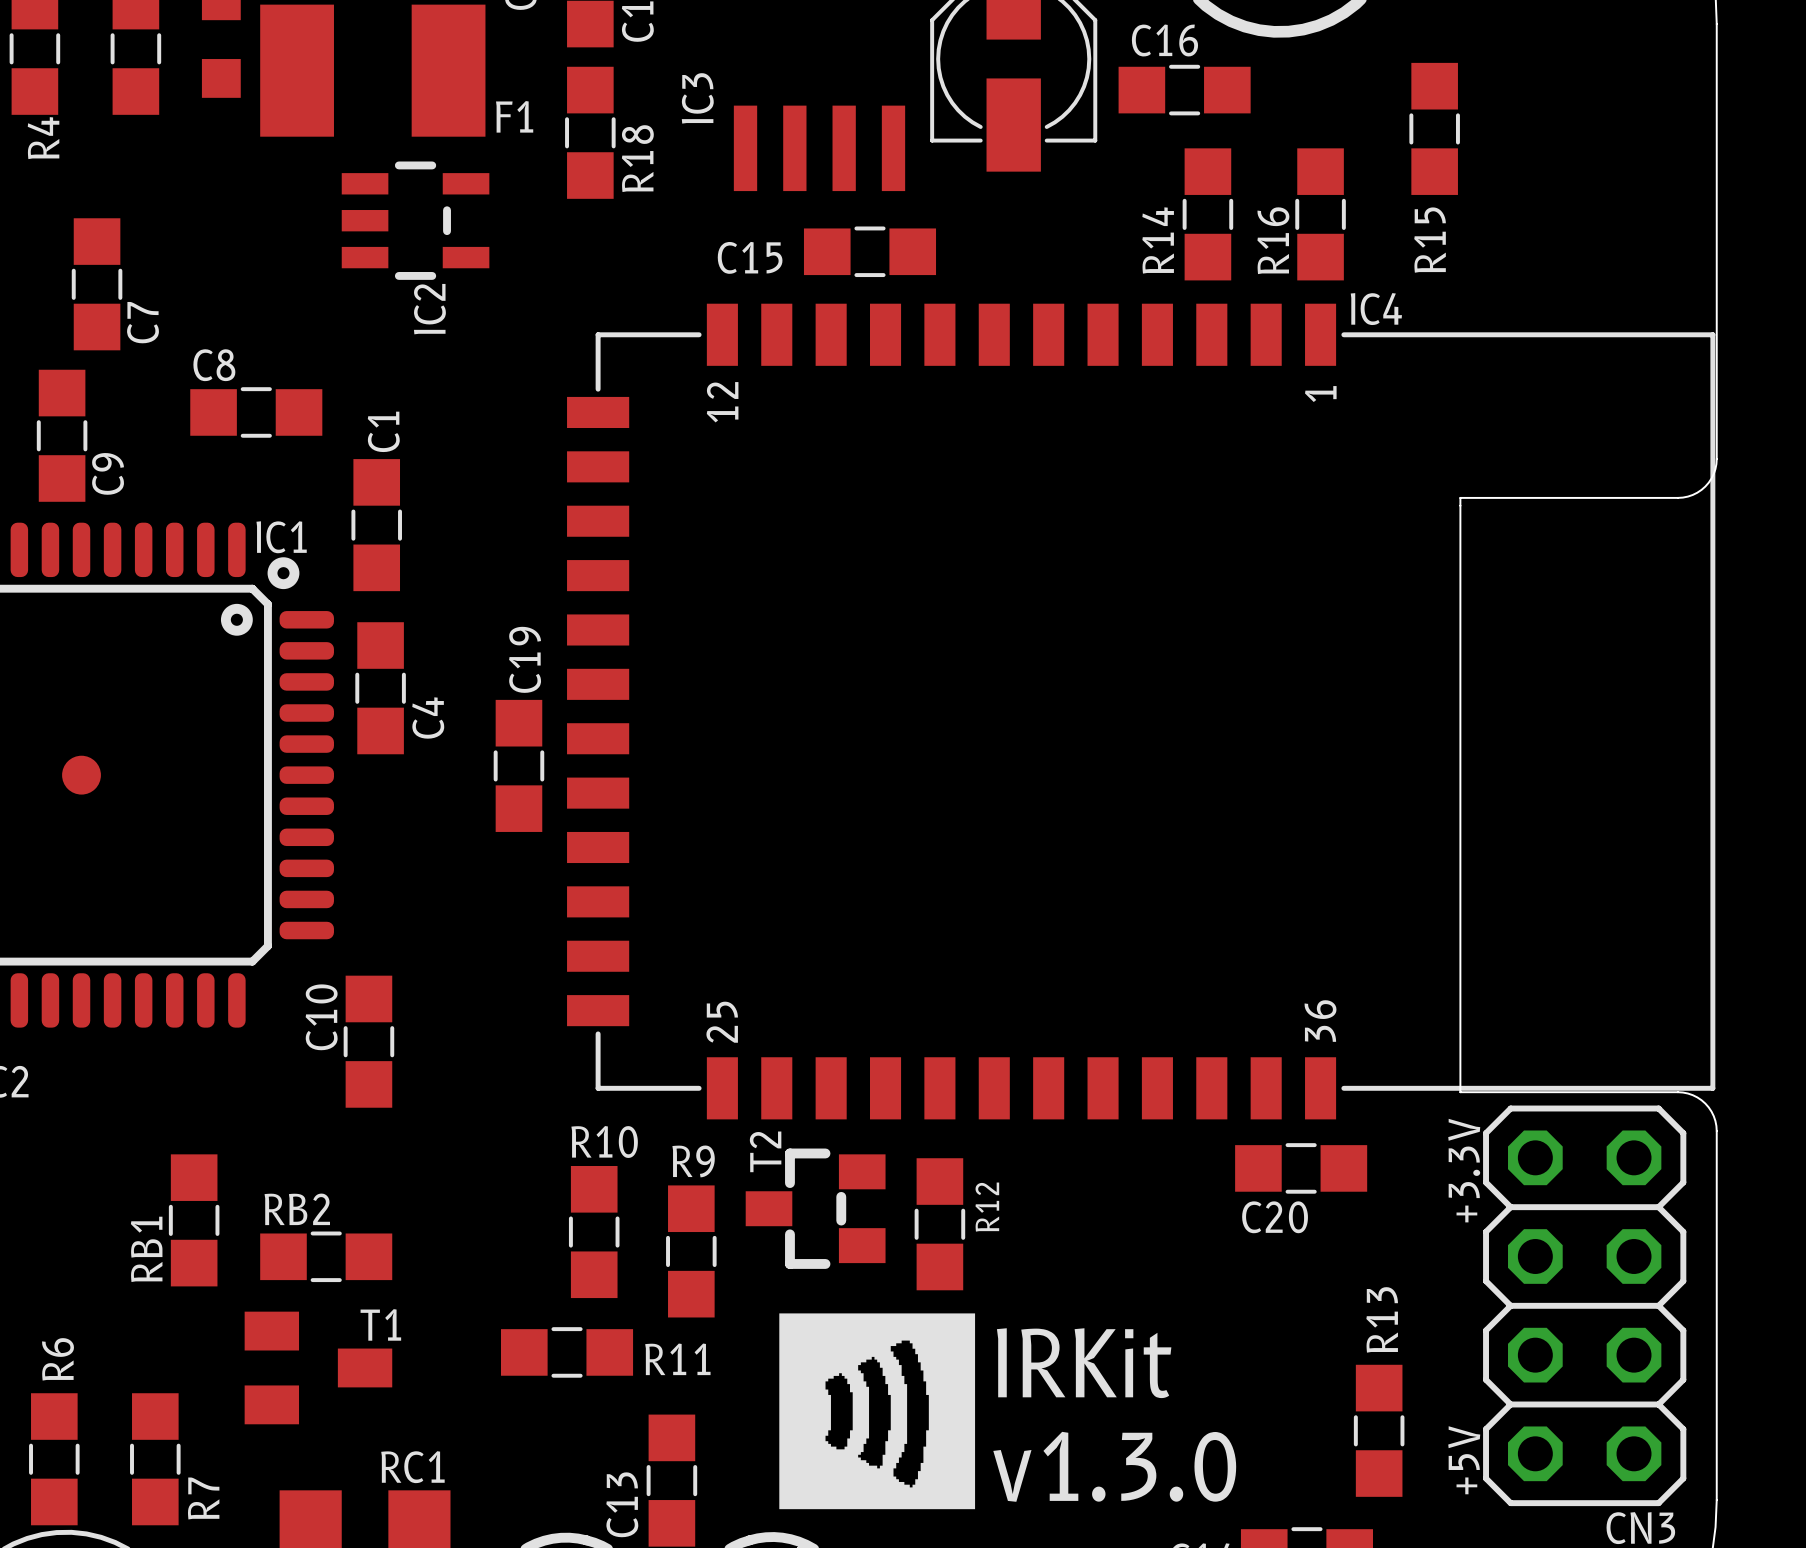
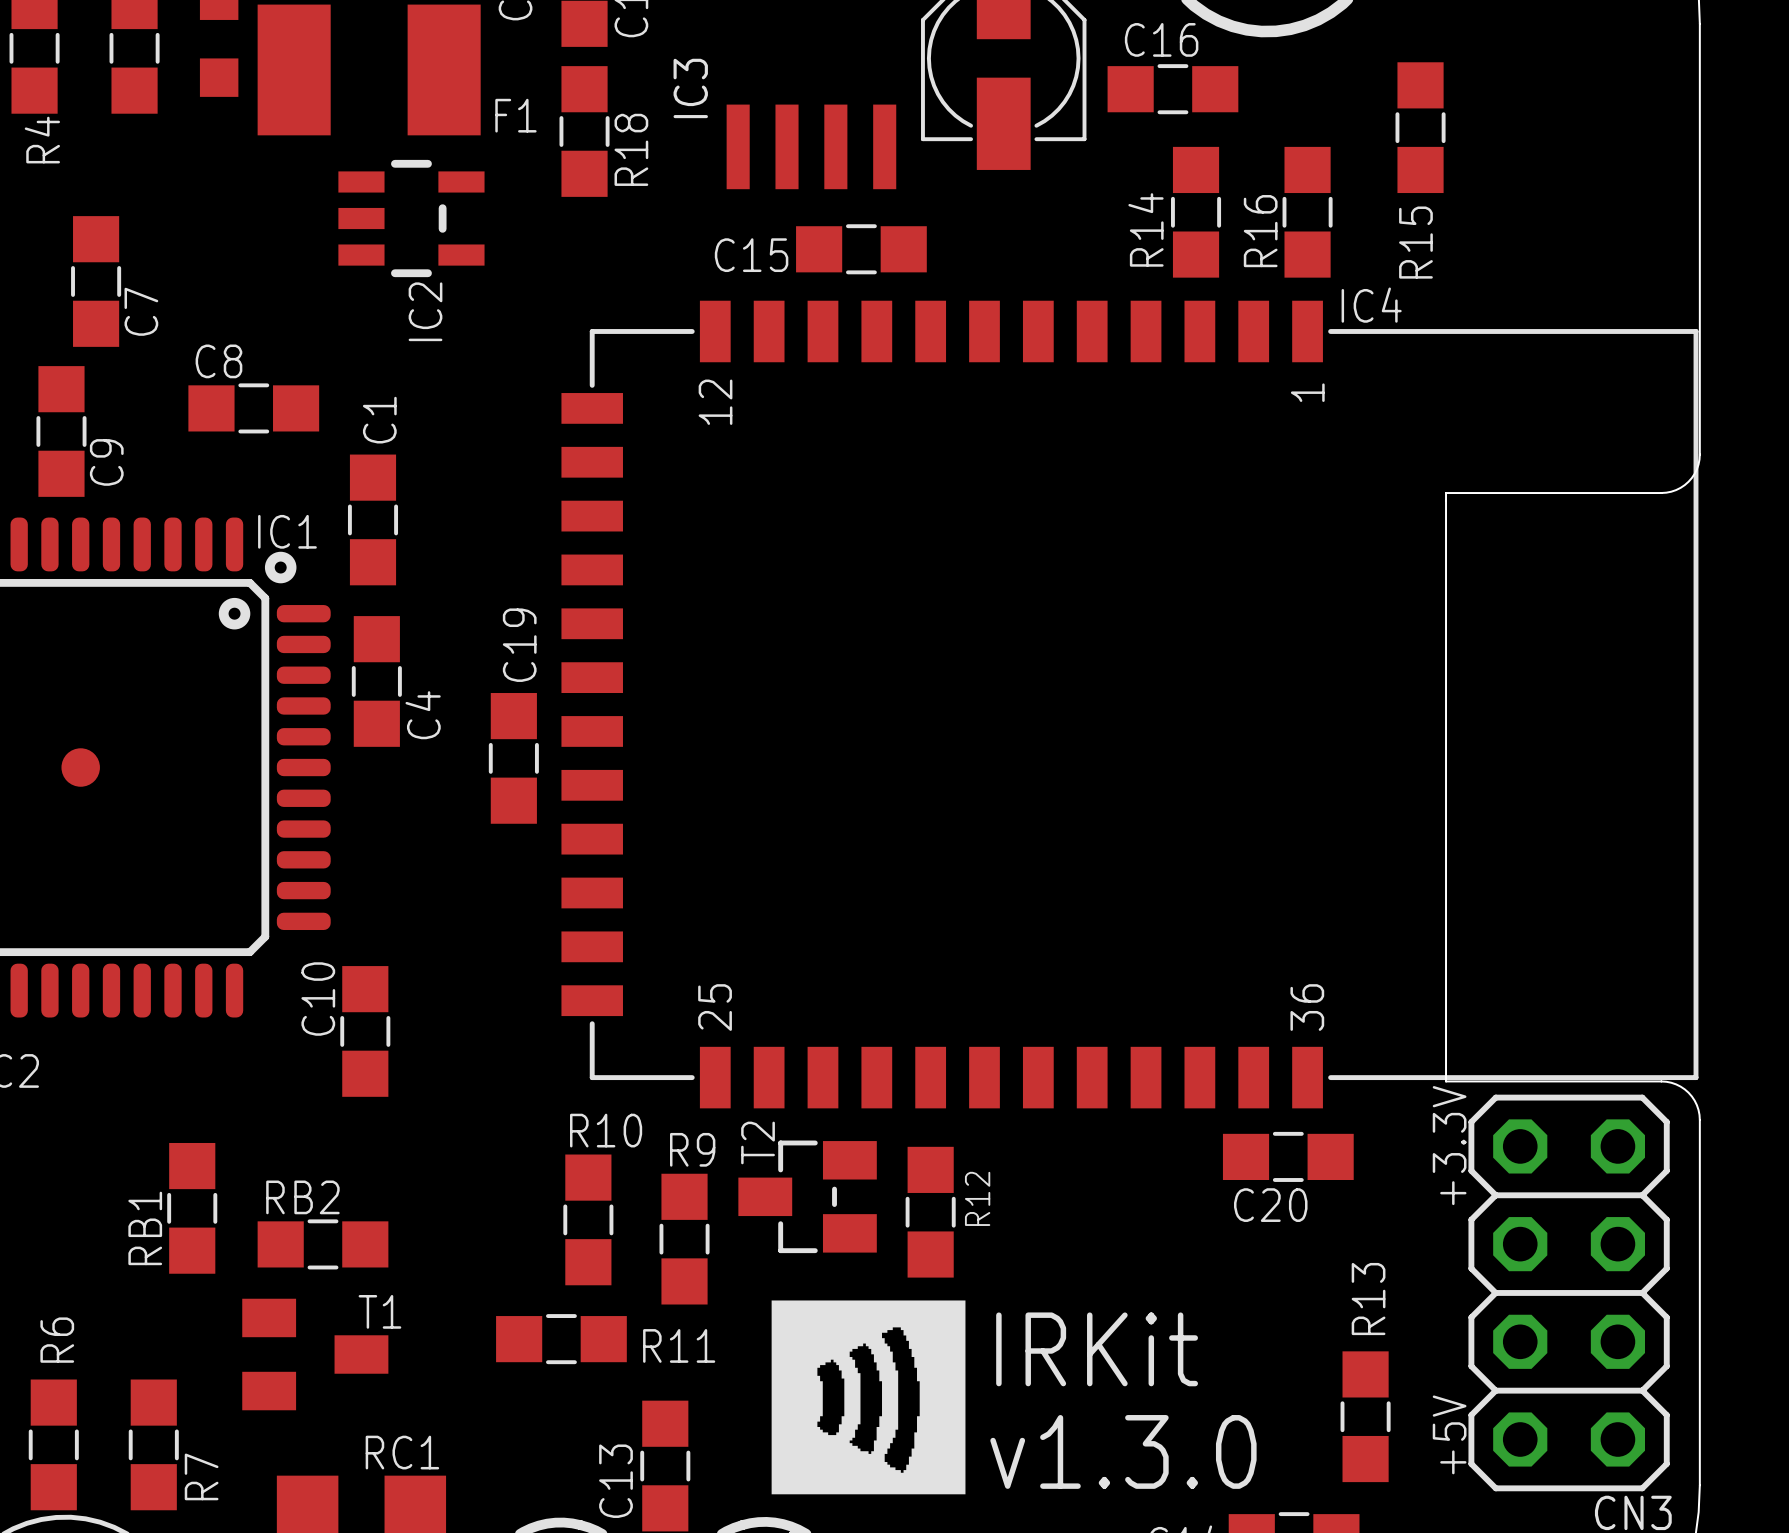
T2 footprint: [745, 1148, 886, 1269] -> [738, 1140, 877, 1254]

